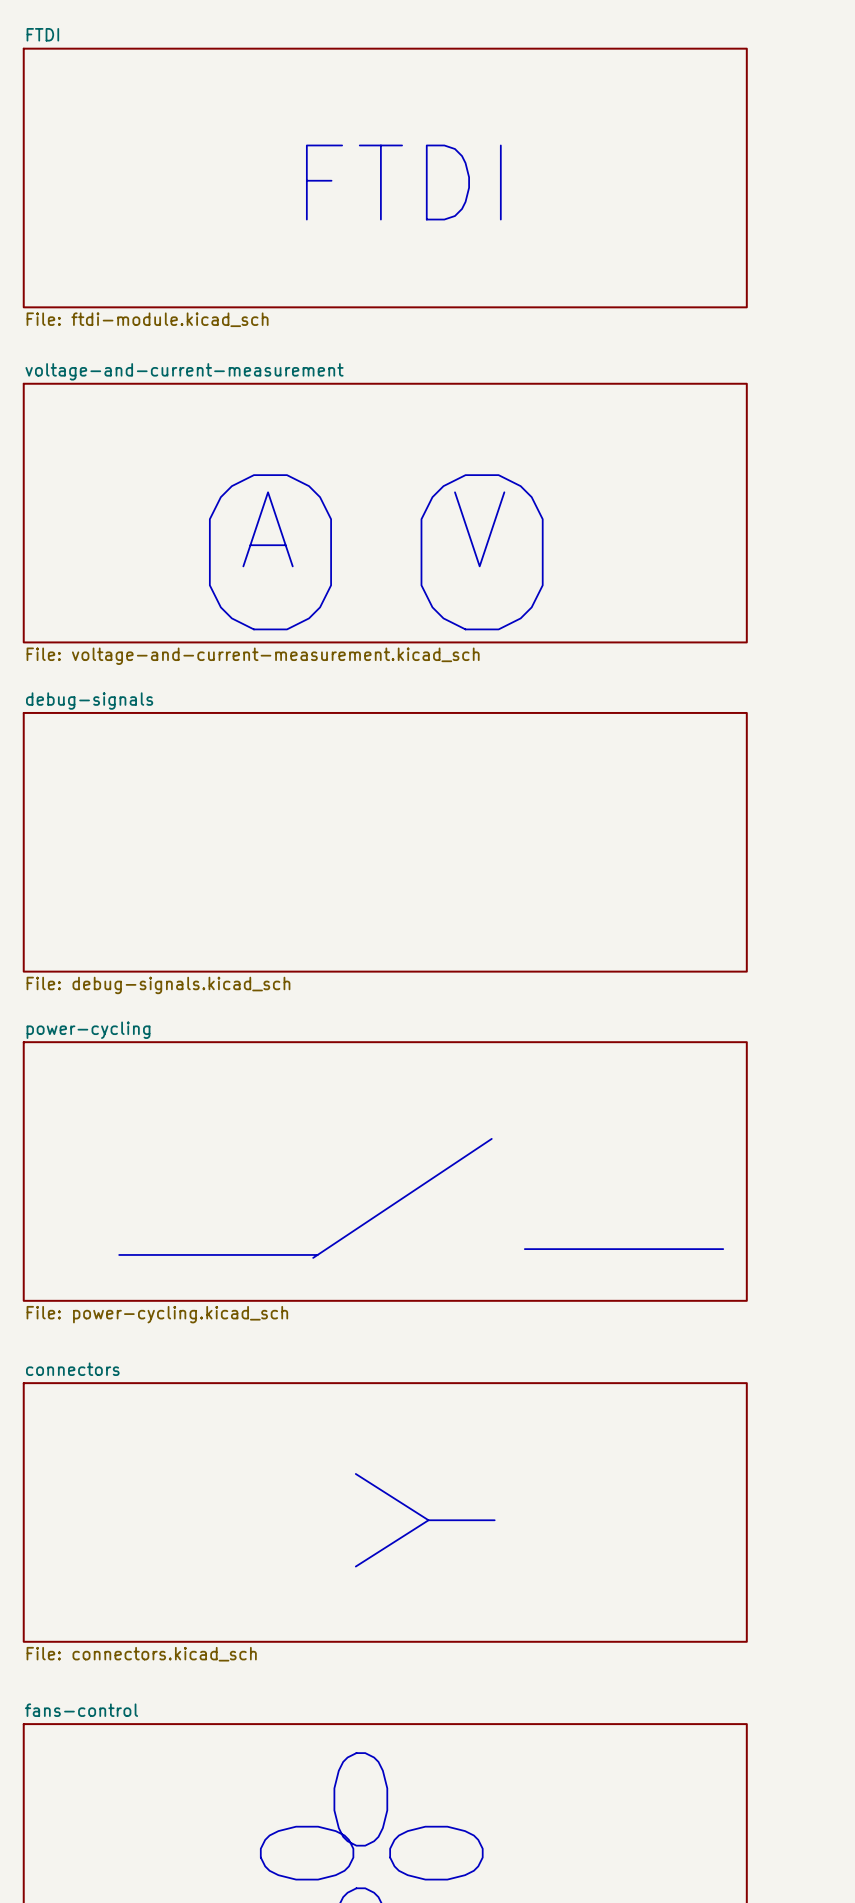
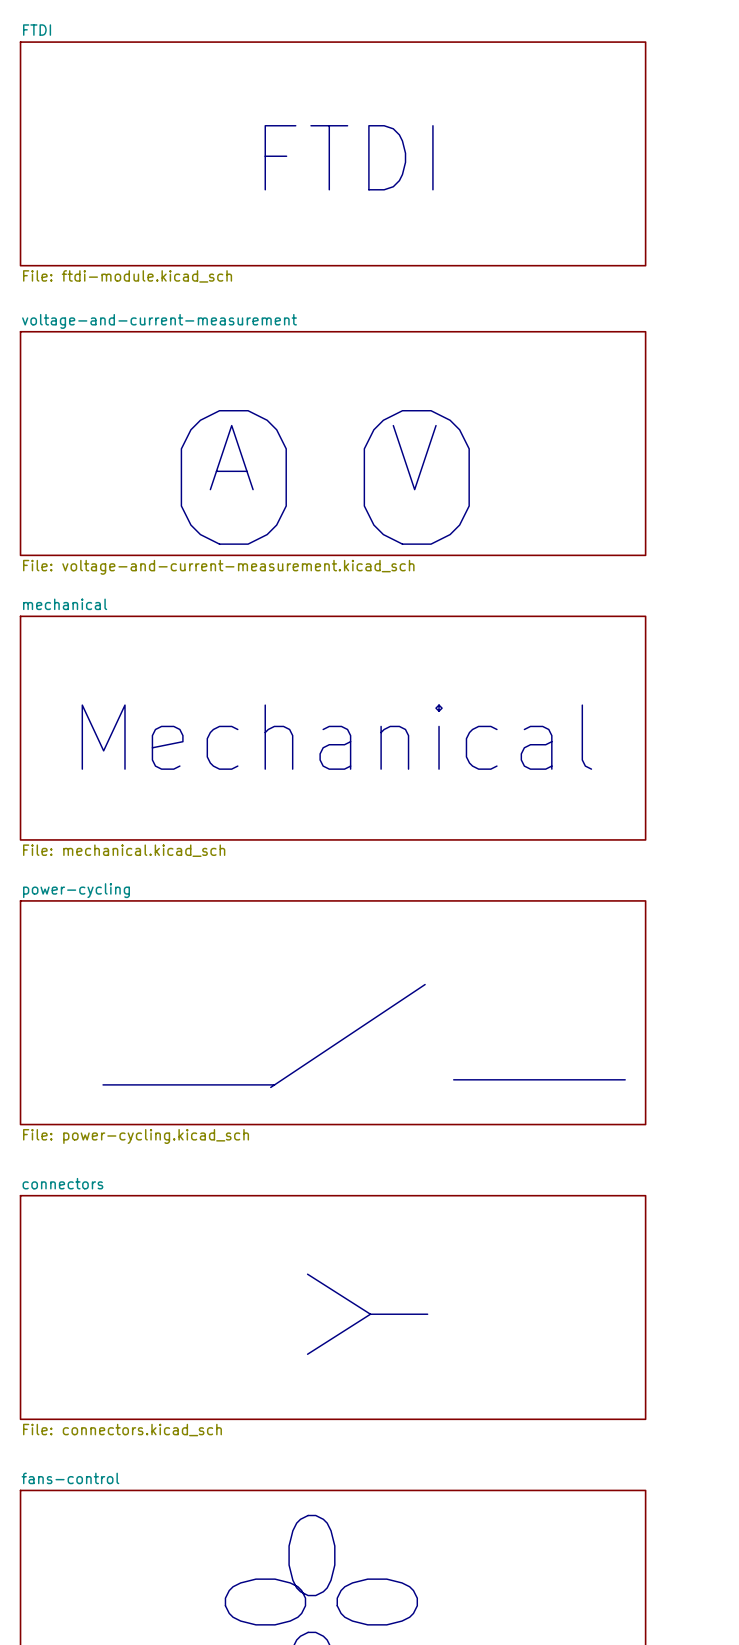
sheet debug-signals name: debug-signals (89, 701) -> mechanical (65, 604)
text: none -> Mechanical (336, 737)
sheet debug-signals value: File: debug-signals.kicad_sch (158, 985) -> File: mechanical.kicad_sch (124, 850)

